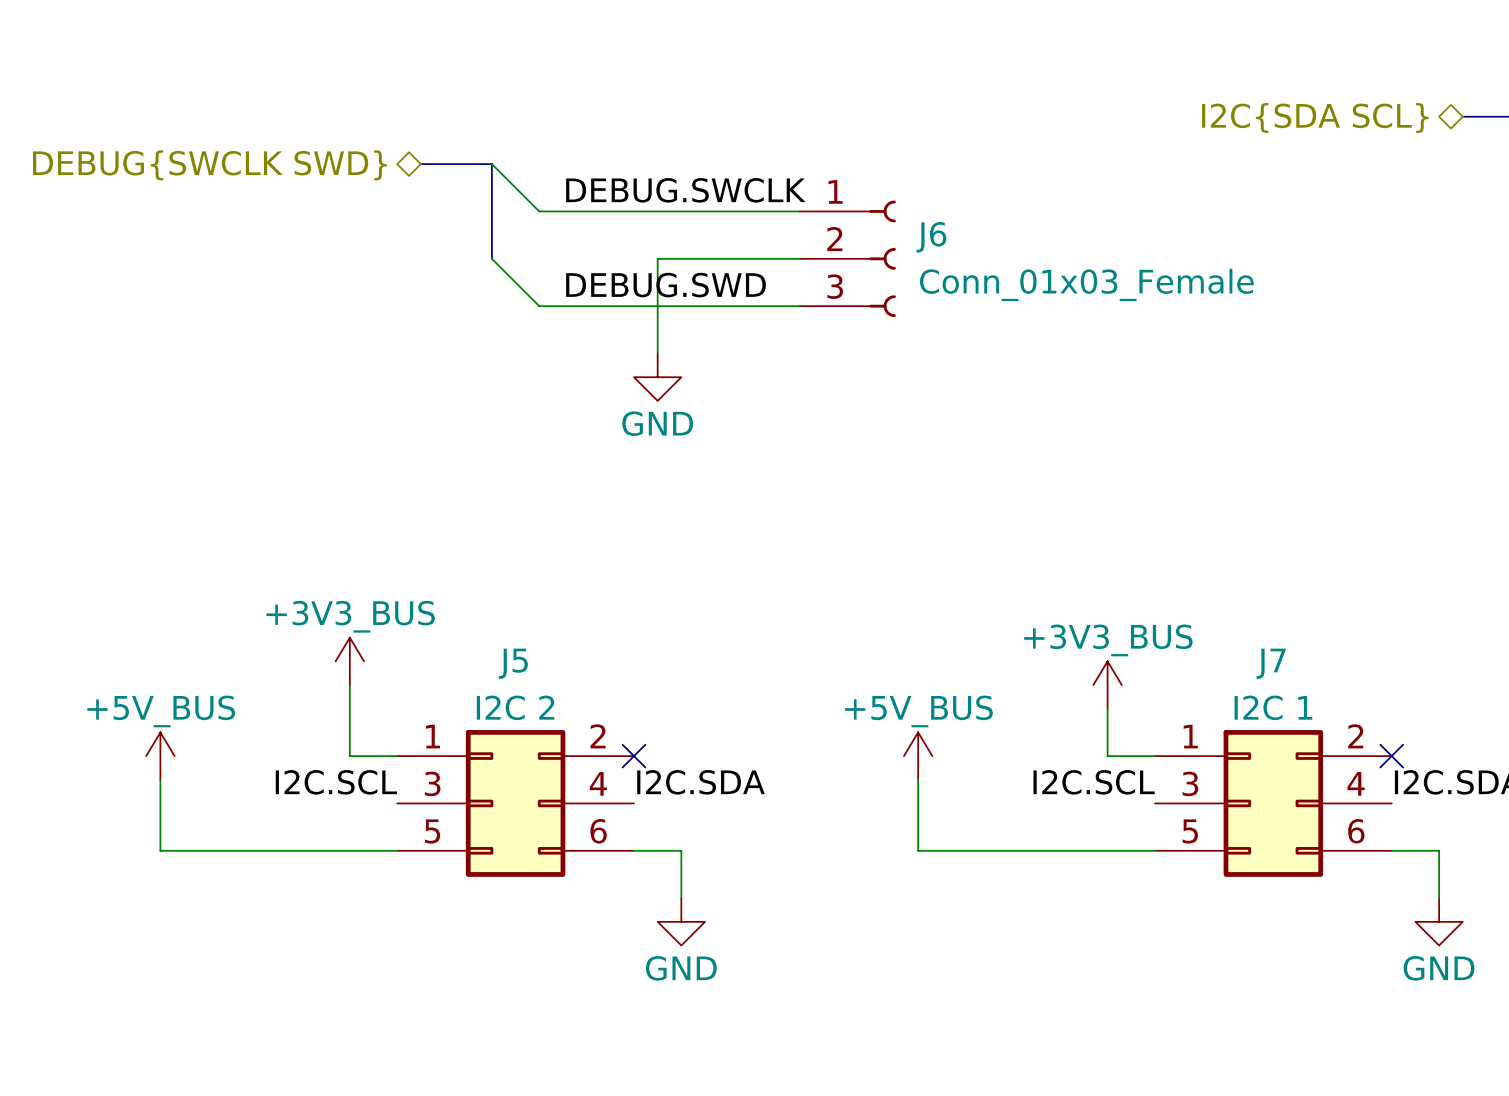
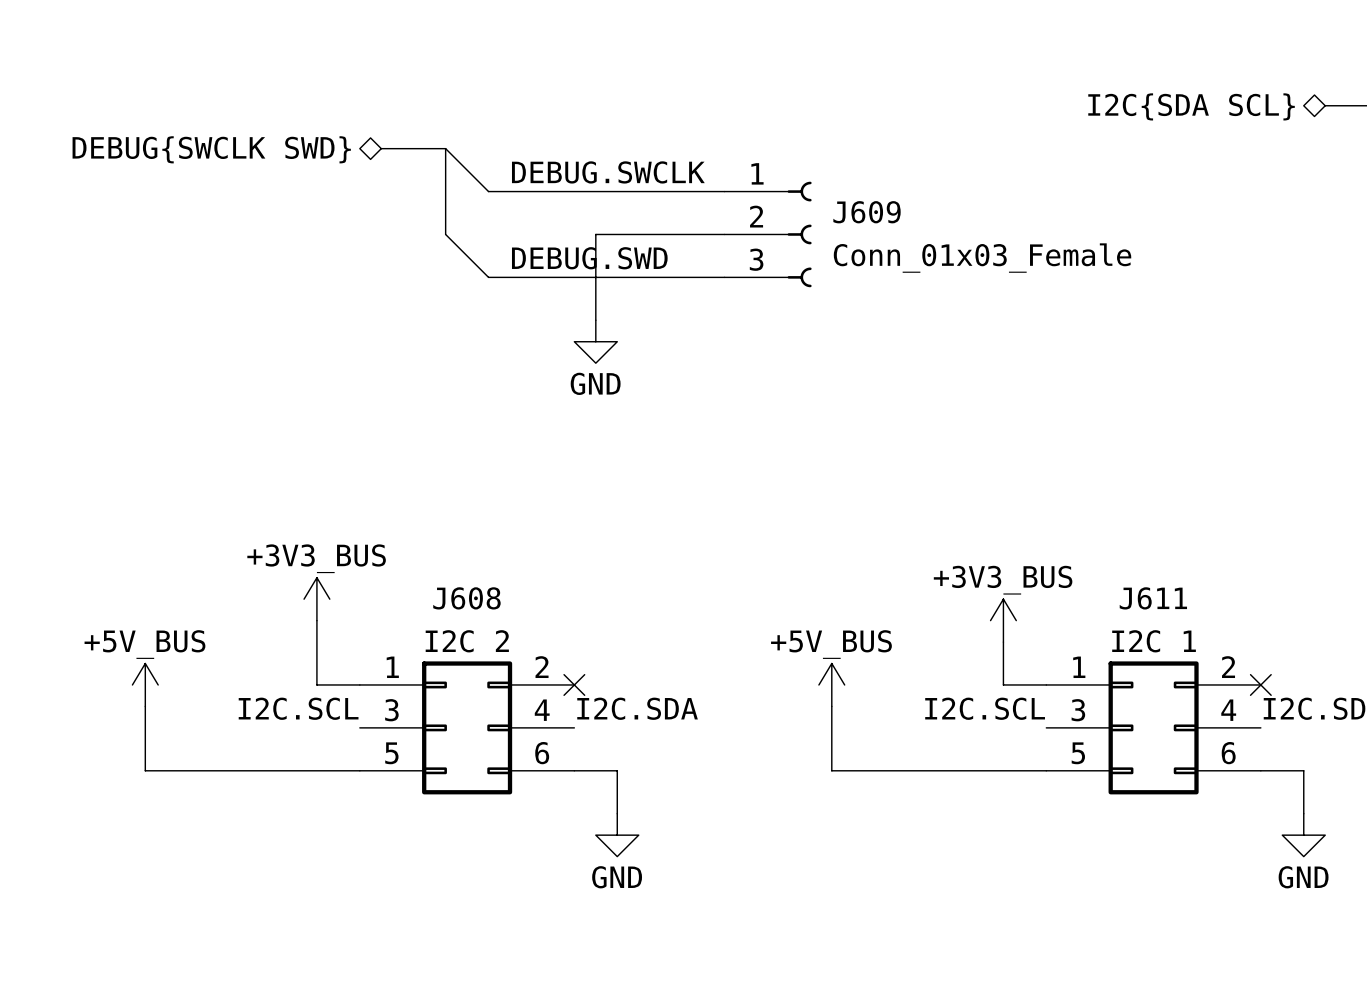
J6 name: J6 (931, 237) -> J609 (867, 212)
J5 name: J5 (513, 663) -> J608 (466, 598)
J7 name: J7 (1271, 663) -> J611 (1153, 598)

